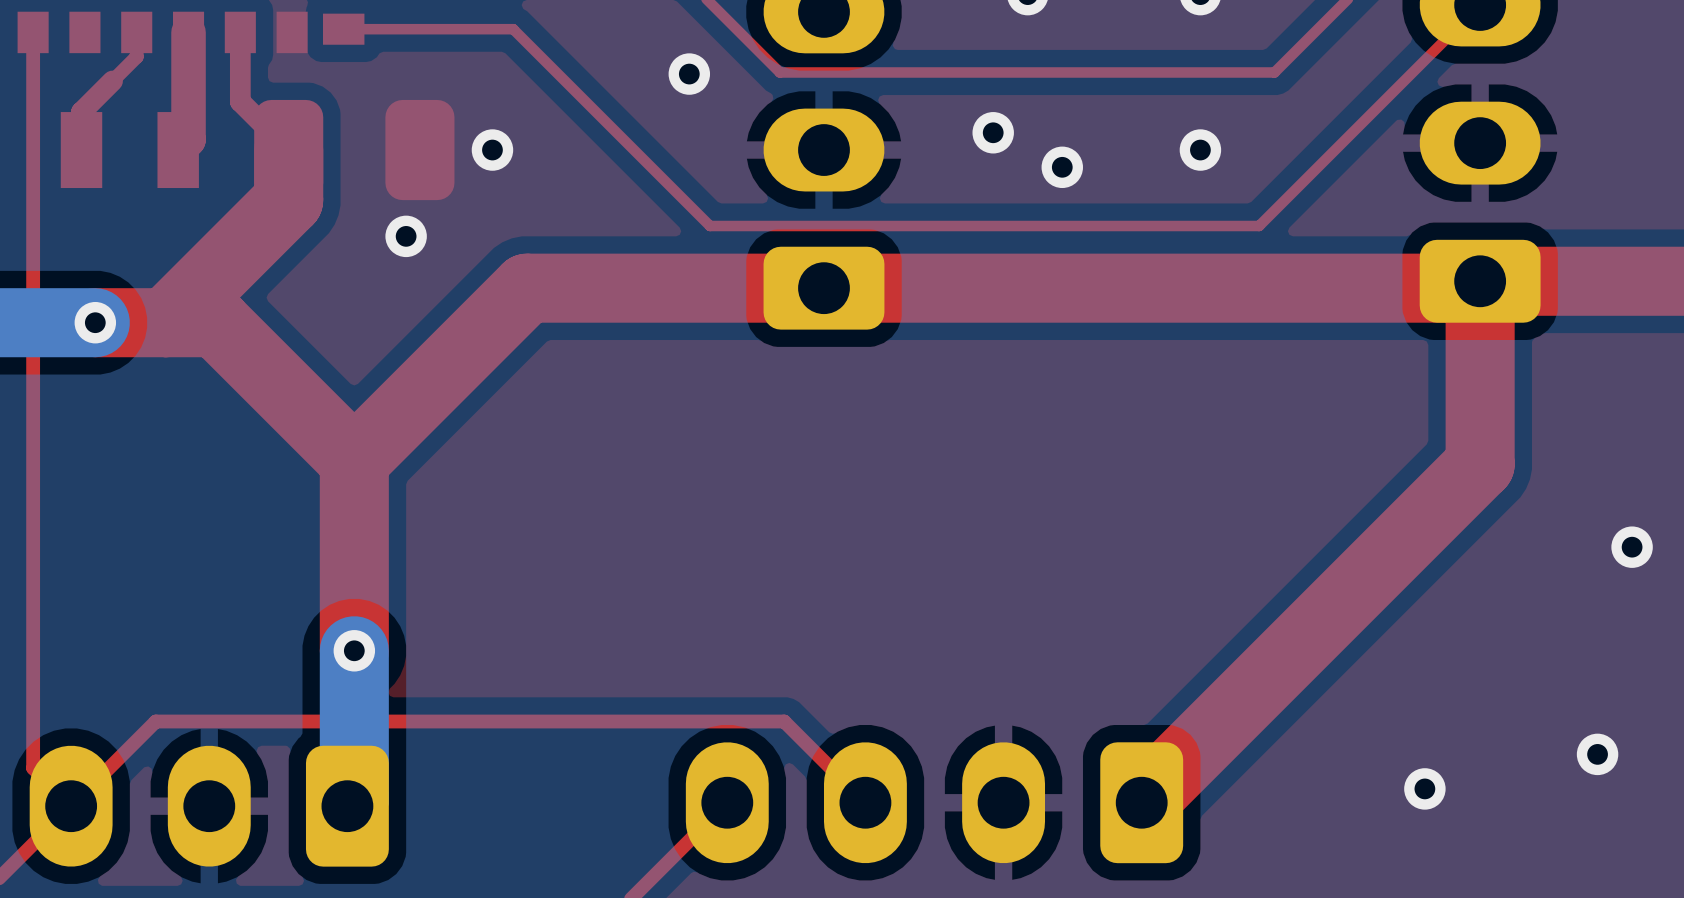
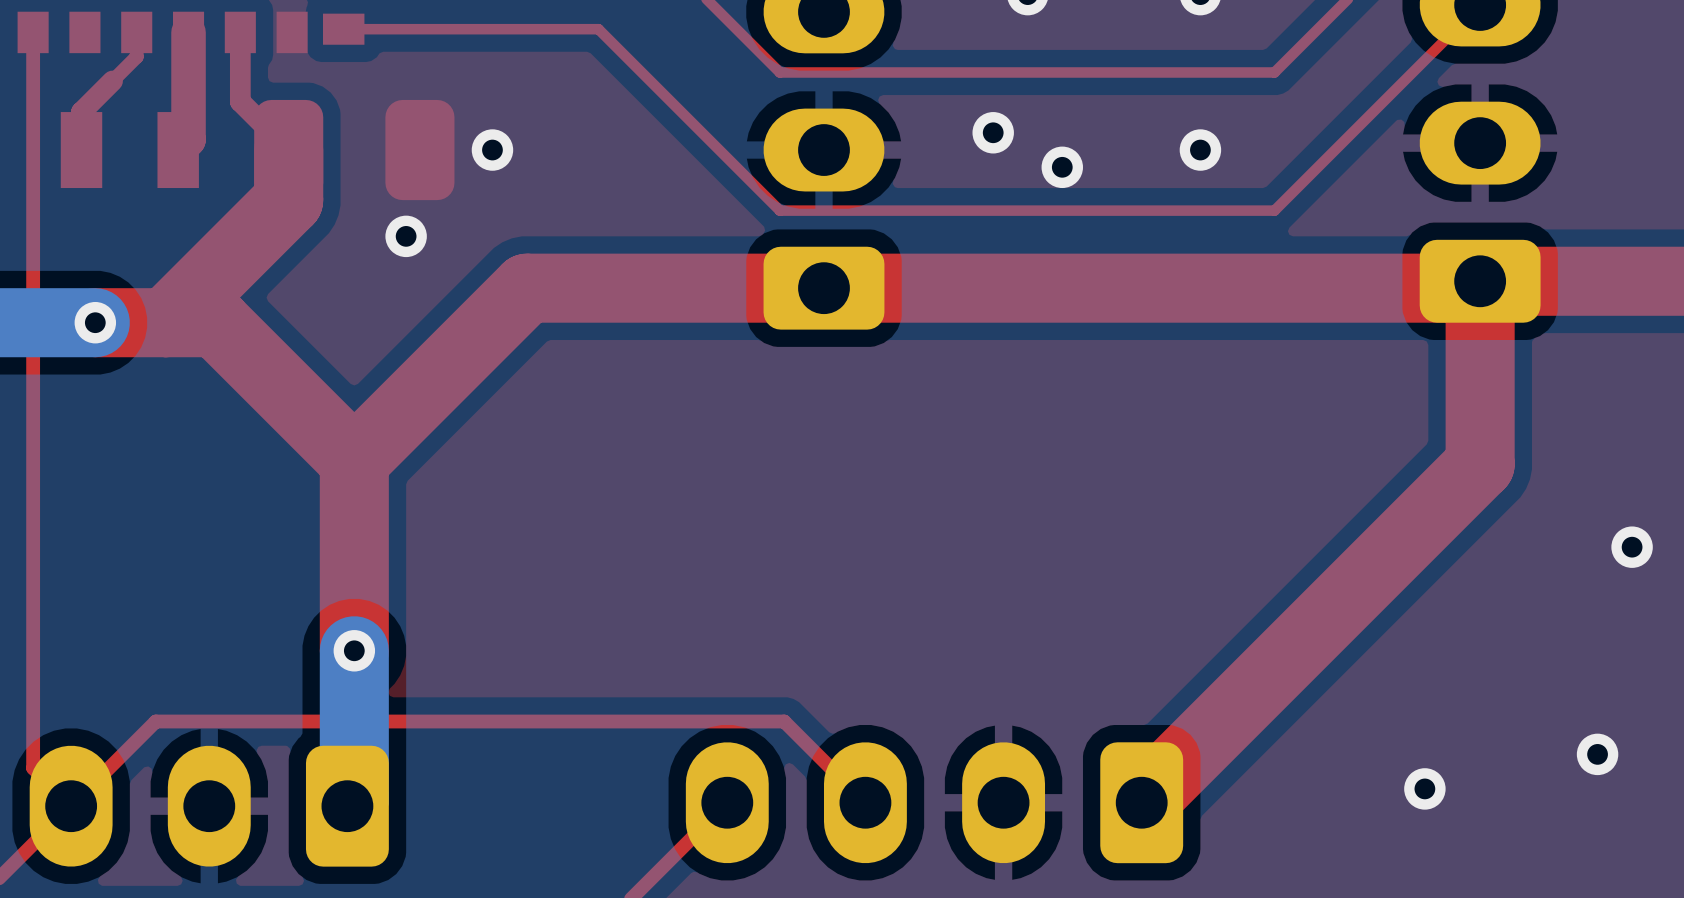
top track: (513, 29) (710, 226) (1259, 226) (1274, 210) -> (513, 29) (598, 29) (779, 210) (1274, 210)
via: (689, 74) -> none

